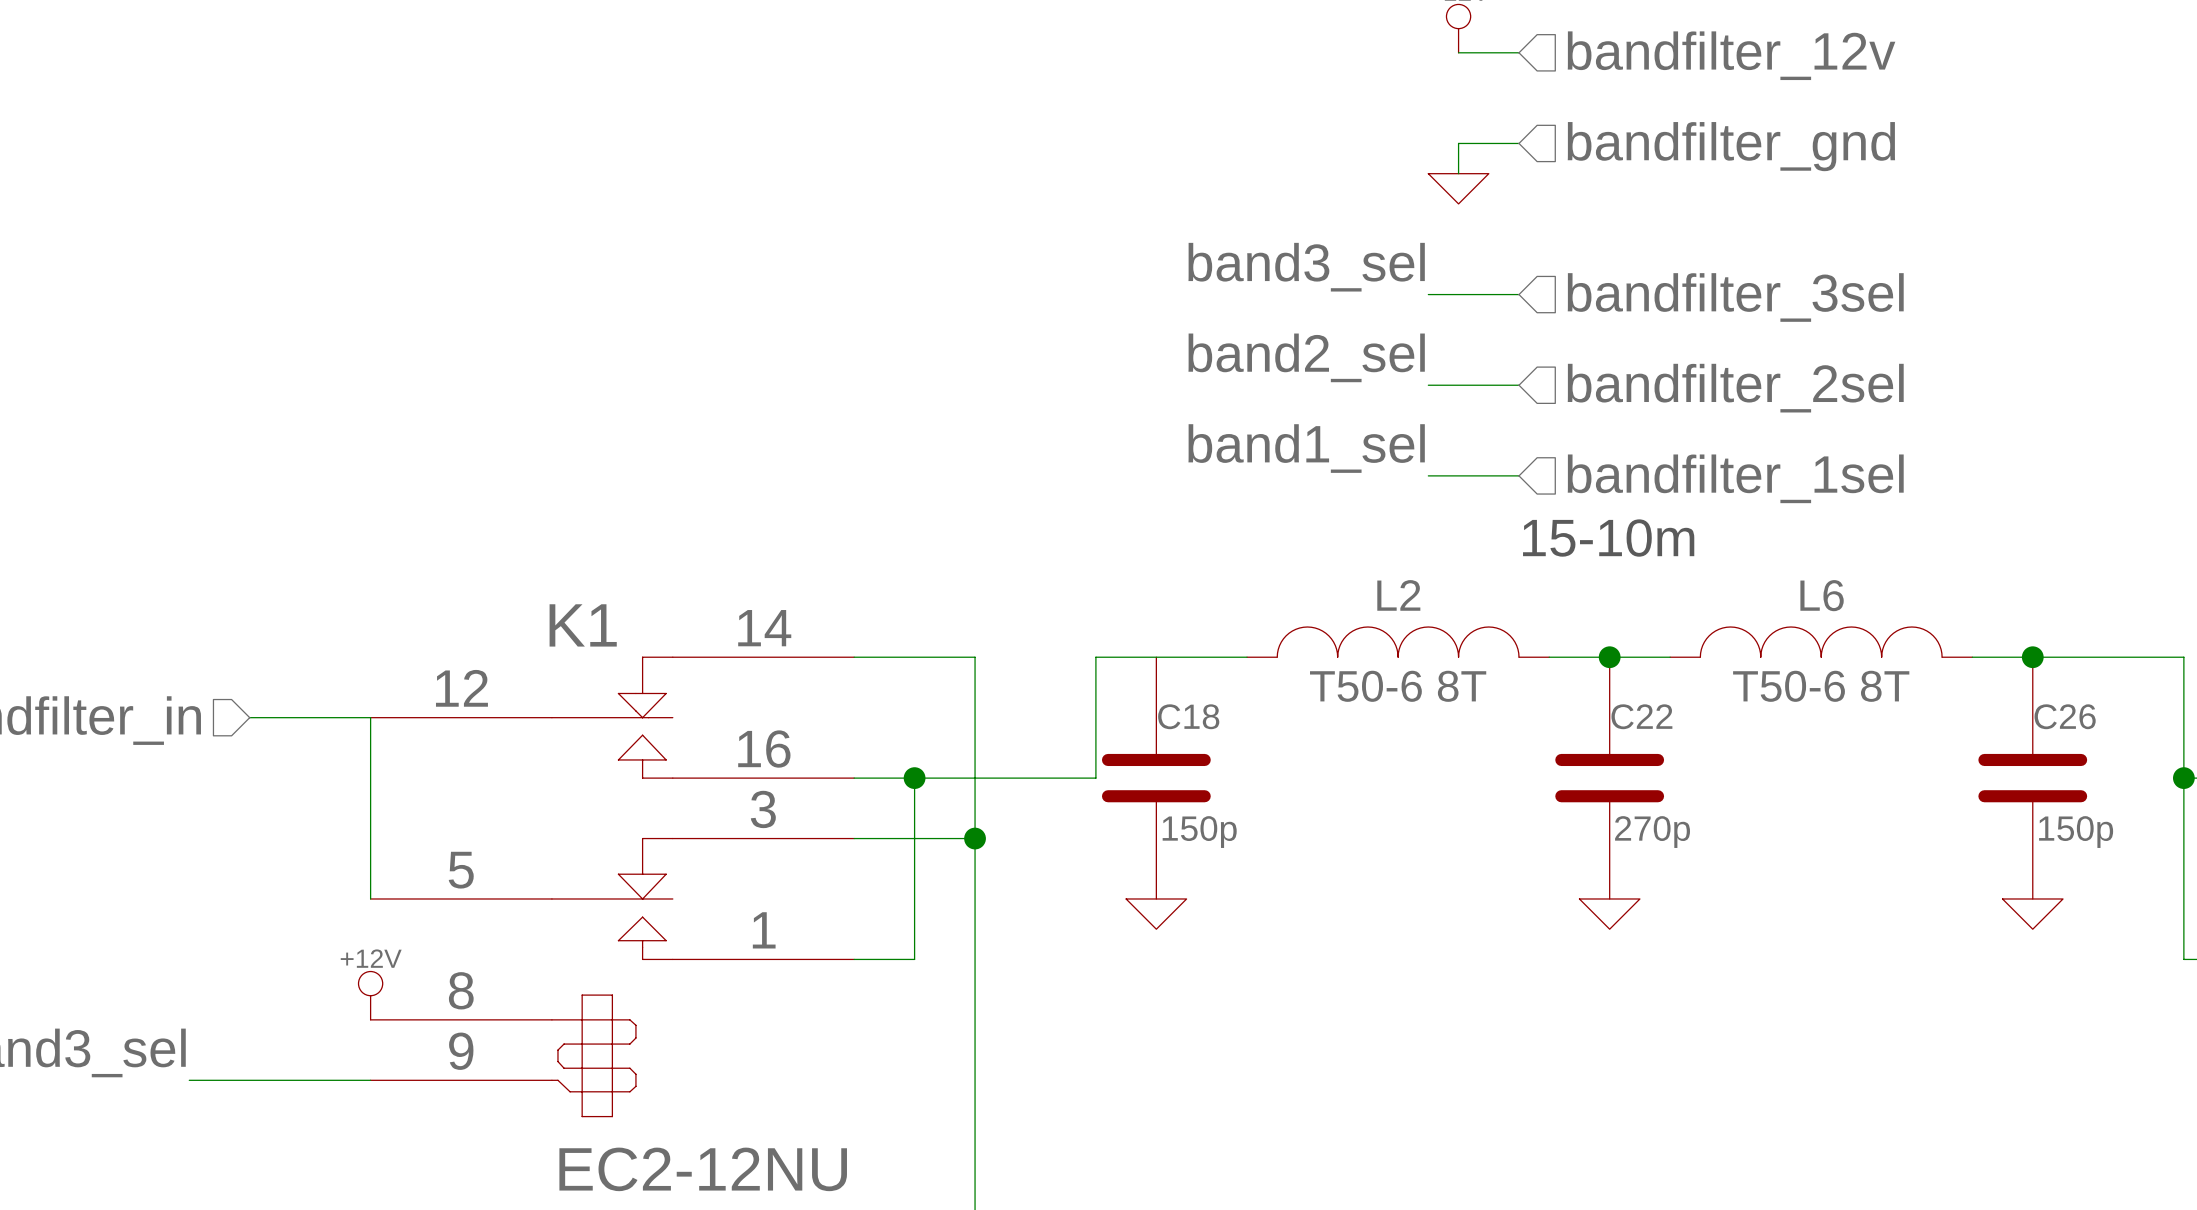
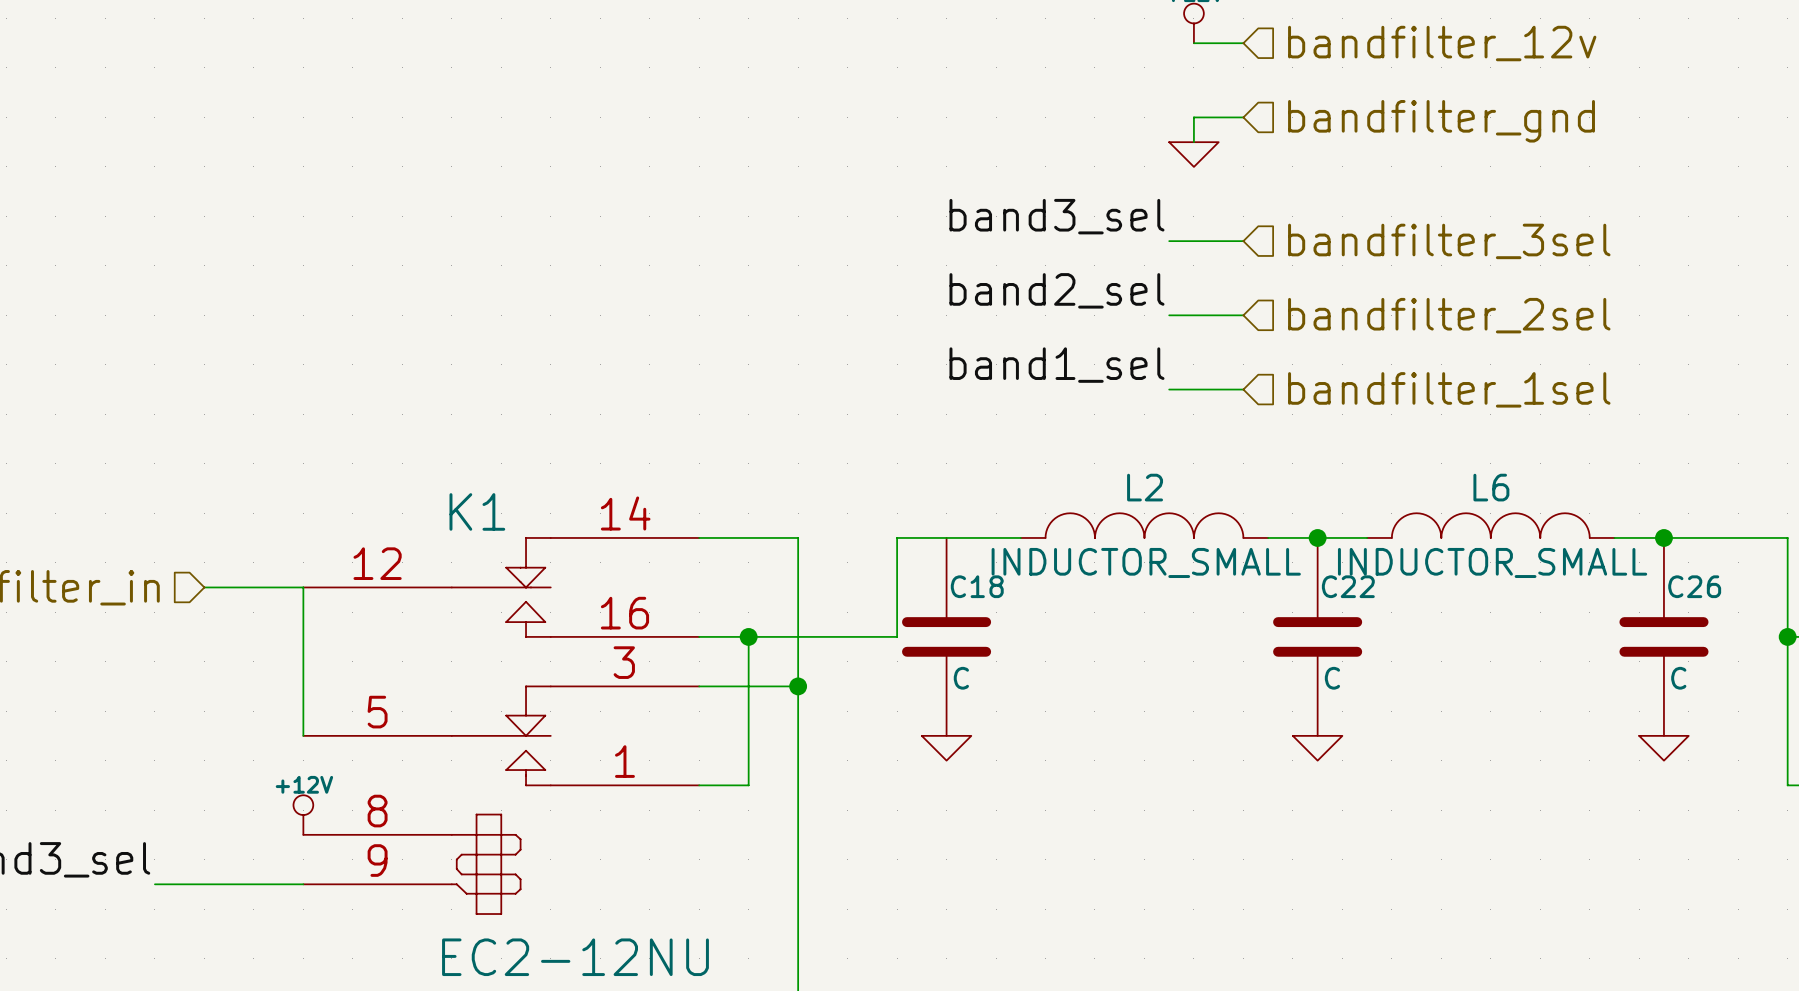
text: 15-10m (1608, 538) -> none
L2 value: T50-6 8T (1398, 686) -> INDUCTOR_SMALL (1146, 562)
L6 value: T50-6 8T (1821, 686) -> INDUCTOR_SMALL (1492, 562)
C18 value: 150p (1199, 832) -> C (961, 678)
C22 value: 270p (1652, 832) -> C (1332, 678)
C26 value: 150p (2076, 832) -> C (1678, 678)

